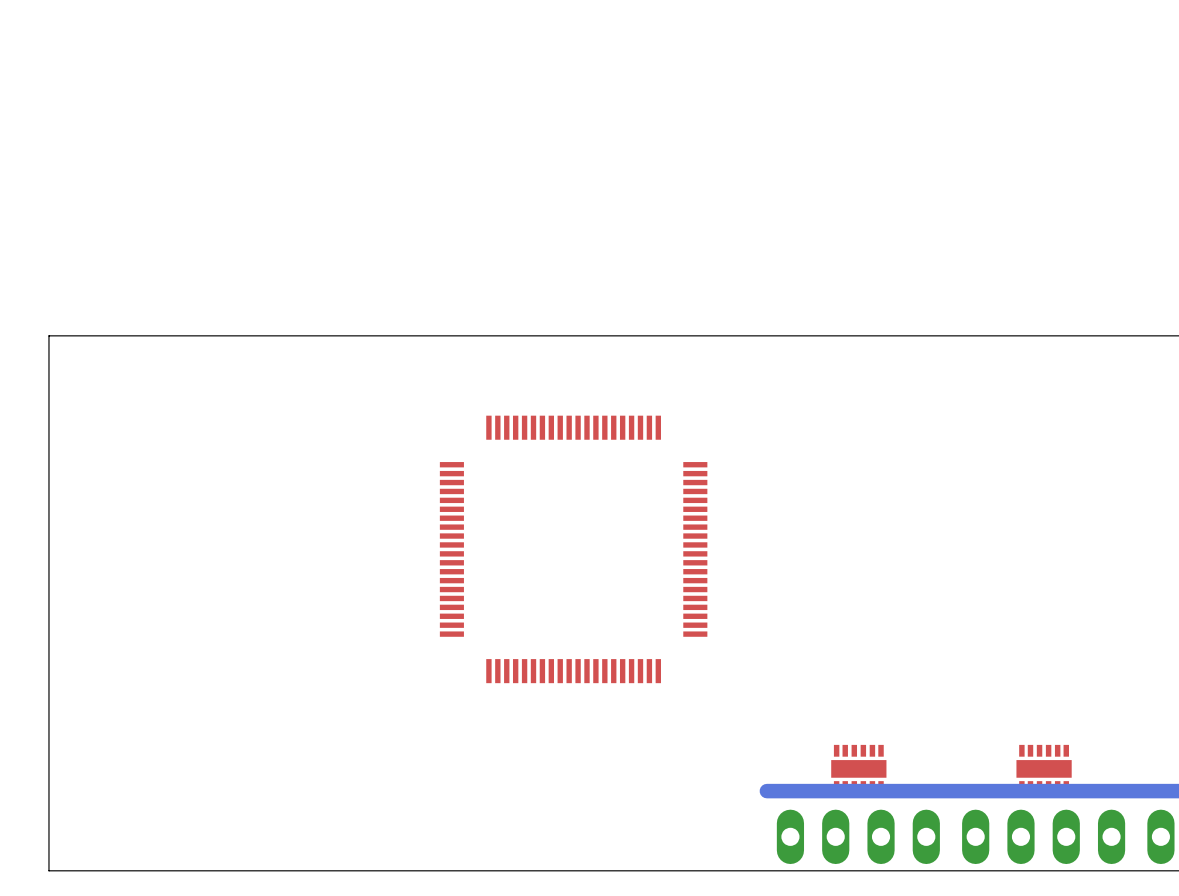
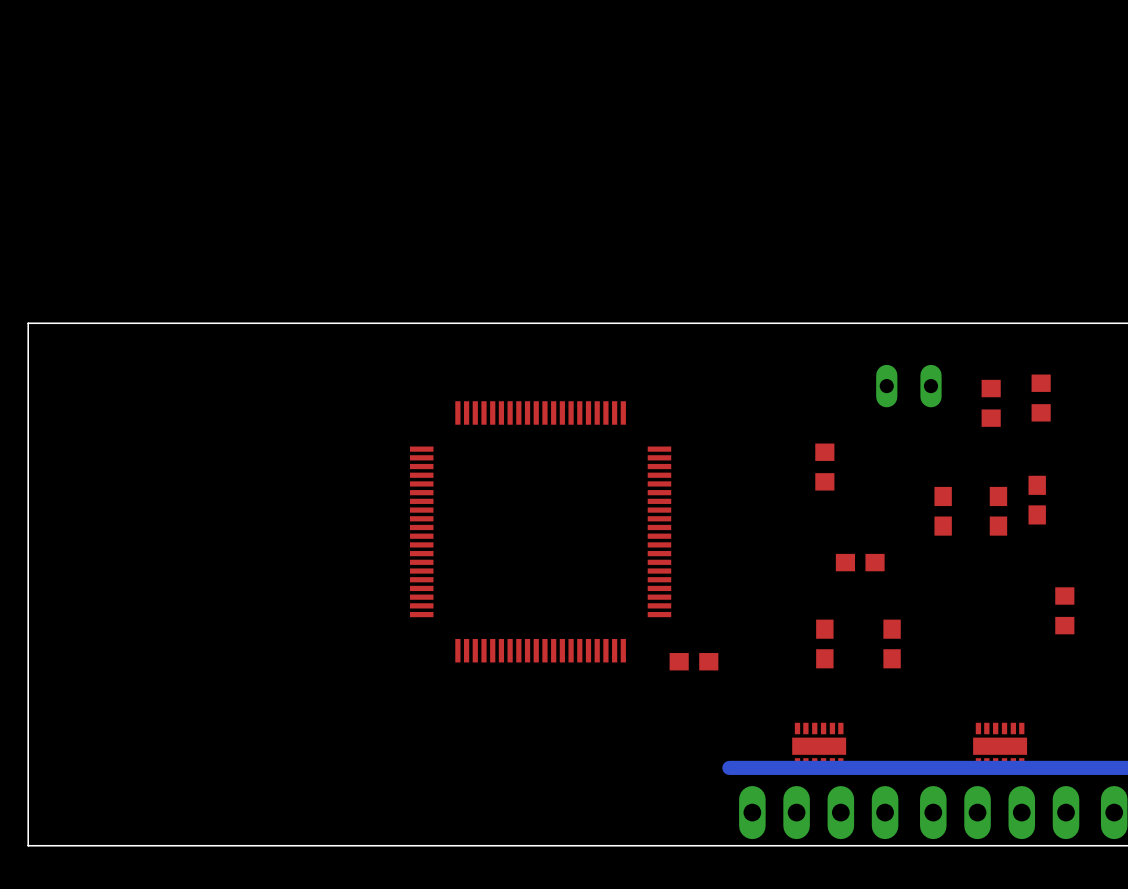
part: none -> (908, 386)
part: none -> (1041, 398)
part: none -> (991, 403)
part: none -> (824, 467)
part: none -> (1037, 500)
part: none -> (943, 511)
part: none -> (998, 511)
part: none -> (860, 562)
part: none -> (1064, 610)
part: none -> (824, 643)
part: none -> (892, 643)
part: none -> (693, 661)

